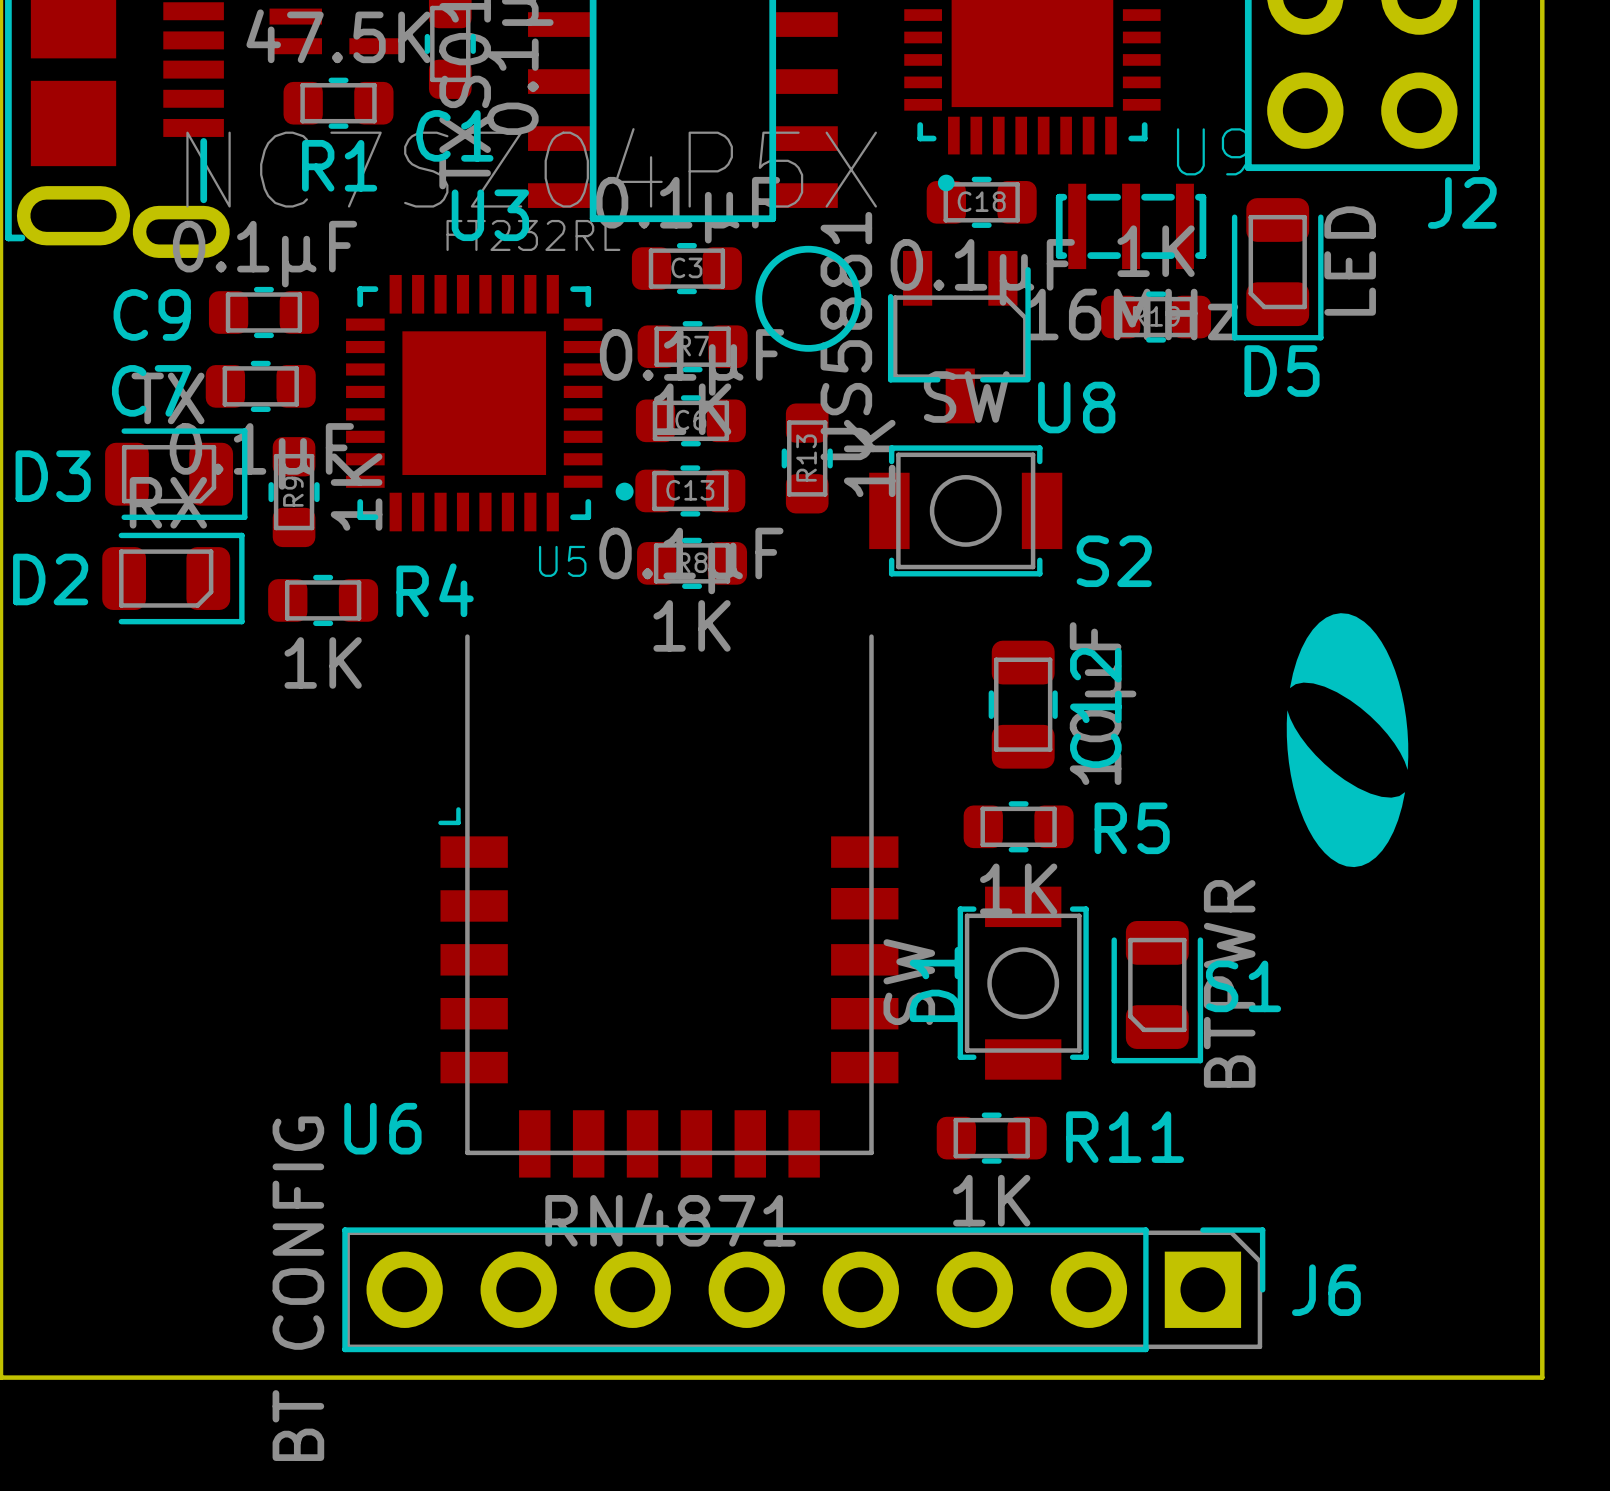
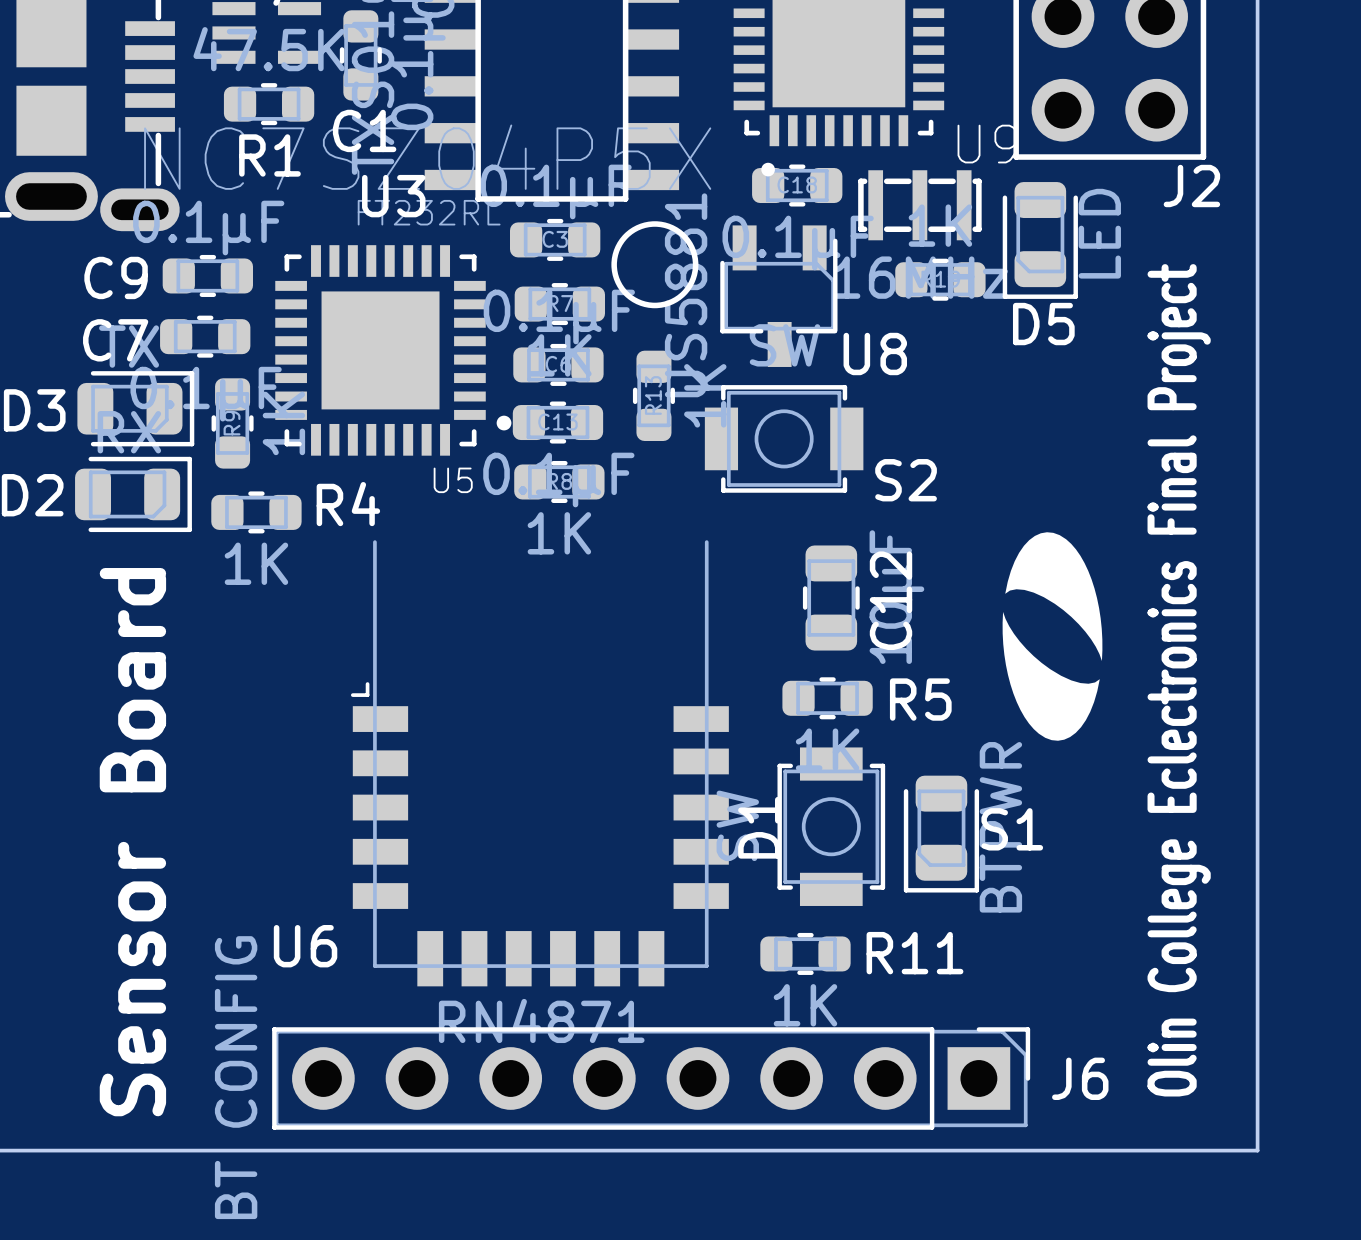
drawing position: (1347, 740) -> (1052, 636)
text: none -> Olin College Eclectronics Final Project (1179, 680)
text: none -> Sensor Board (132, 842)

